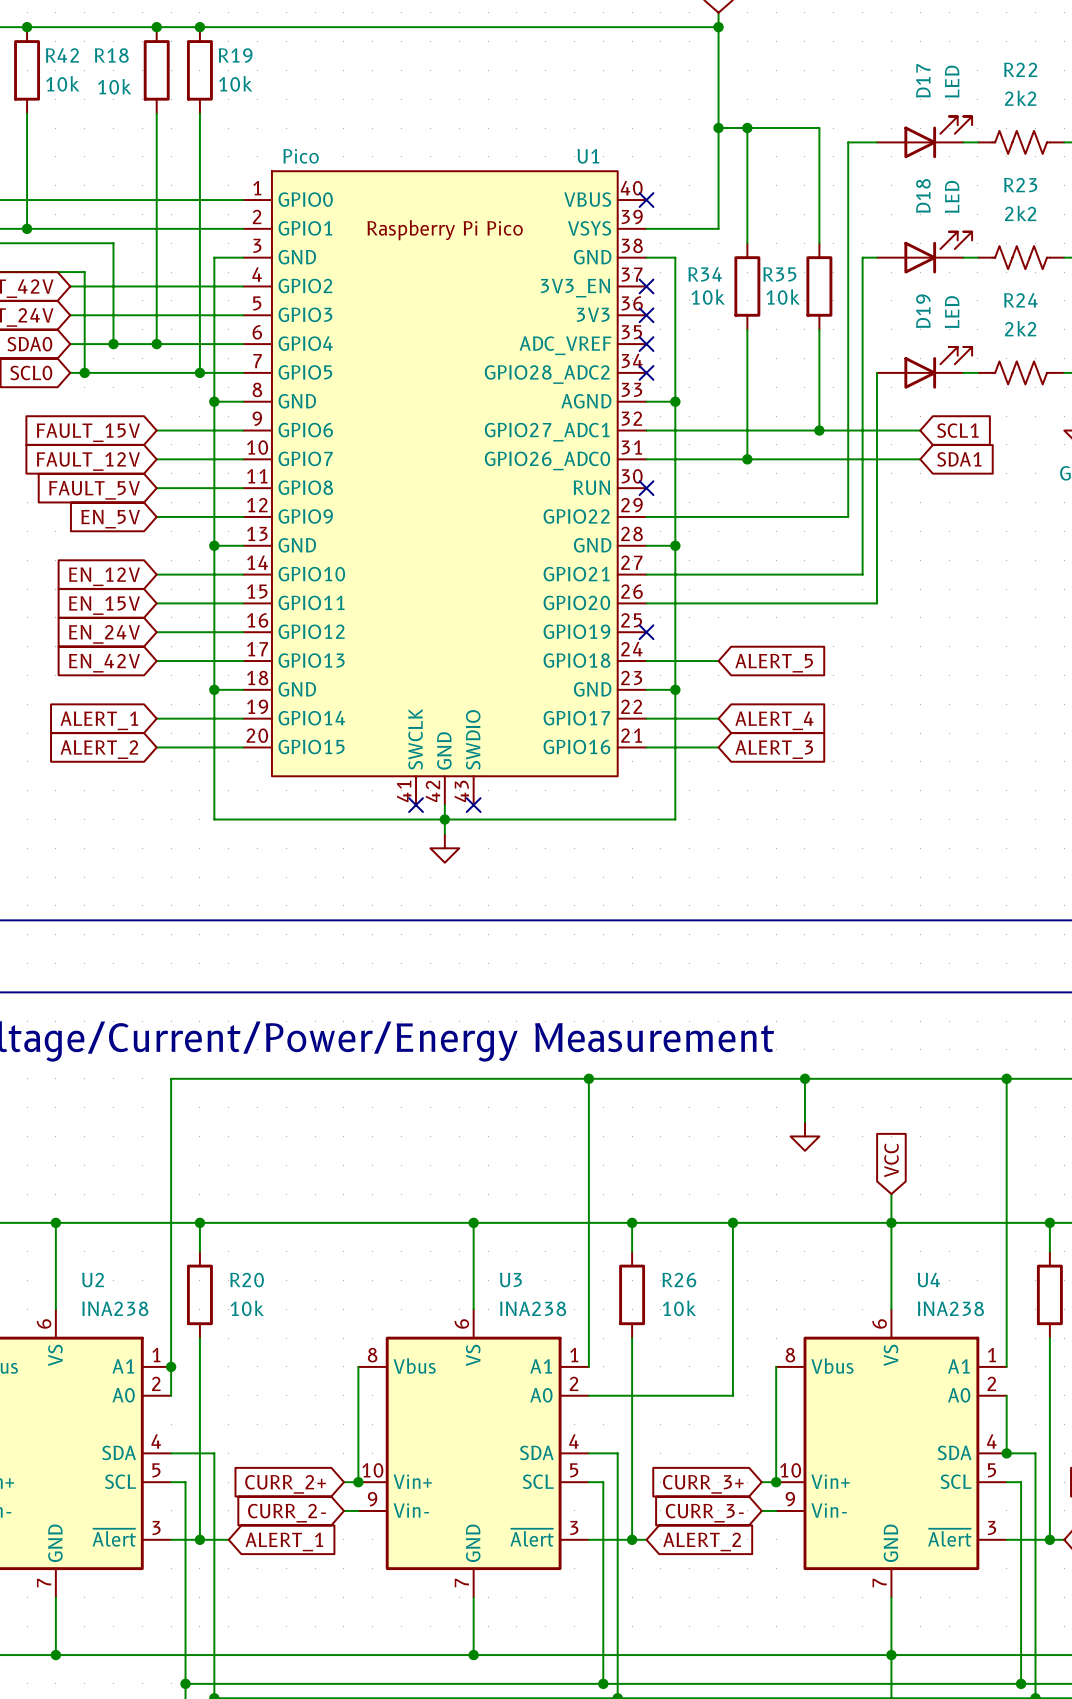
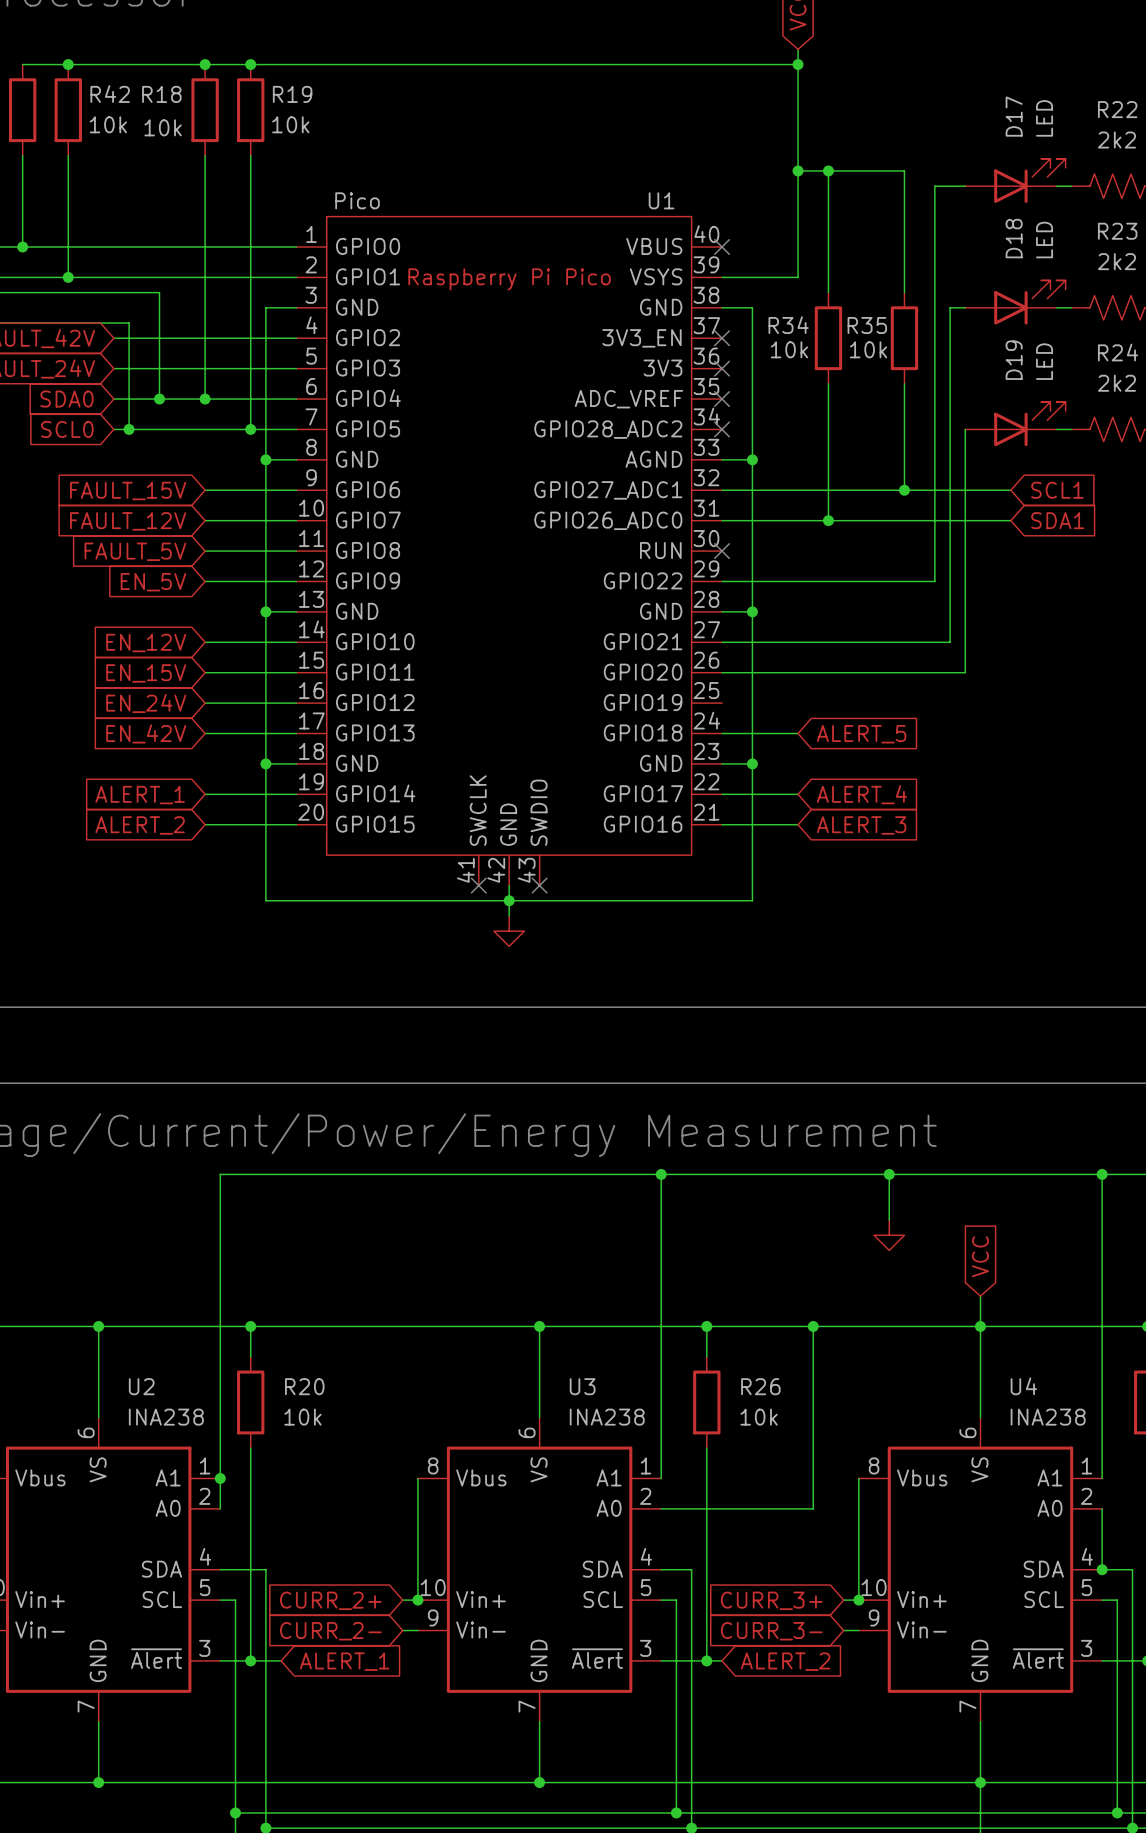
no-connect mark: (646, 632) -> none

